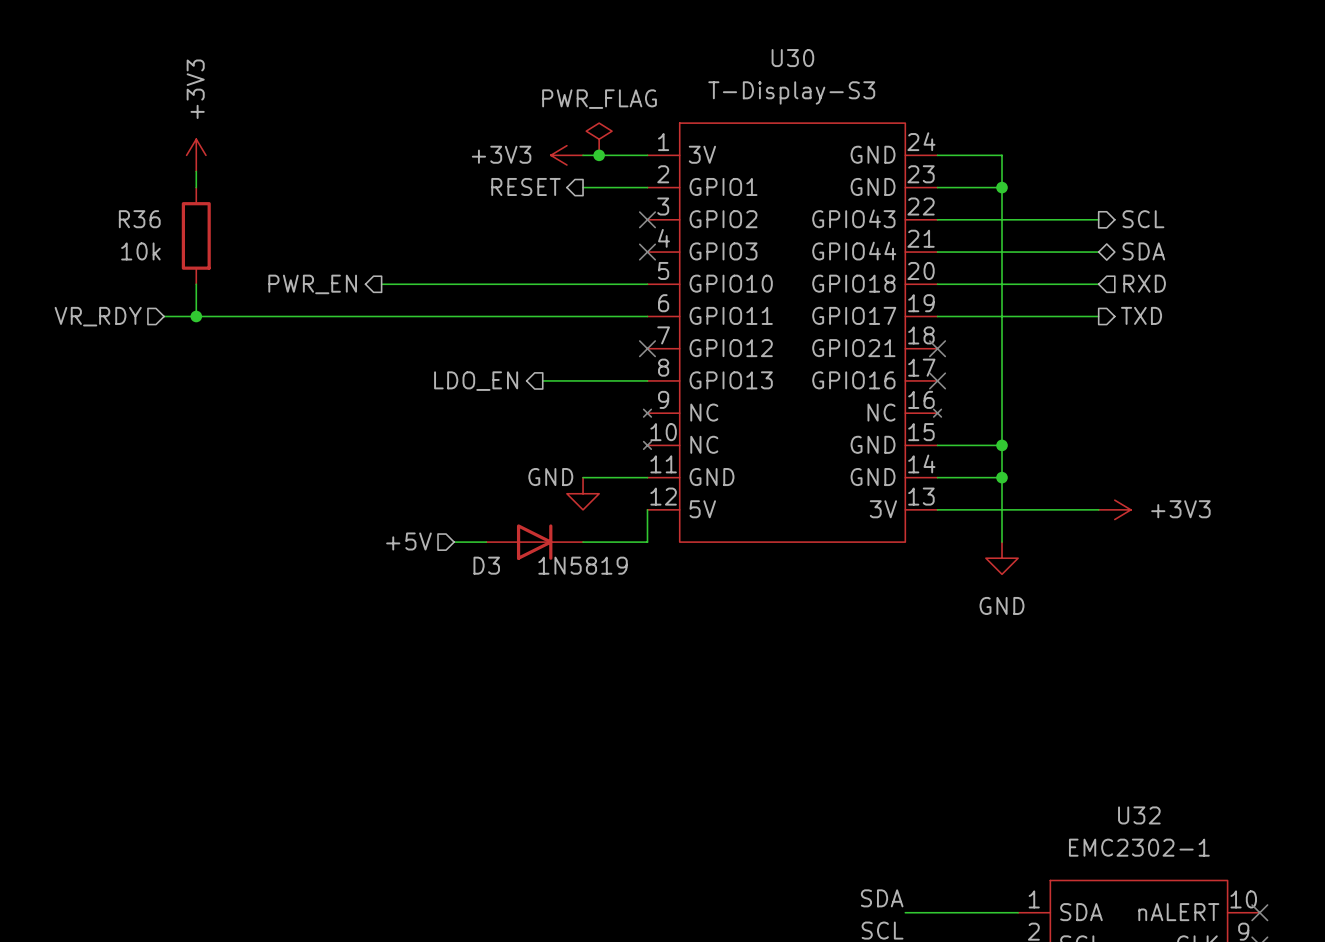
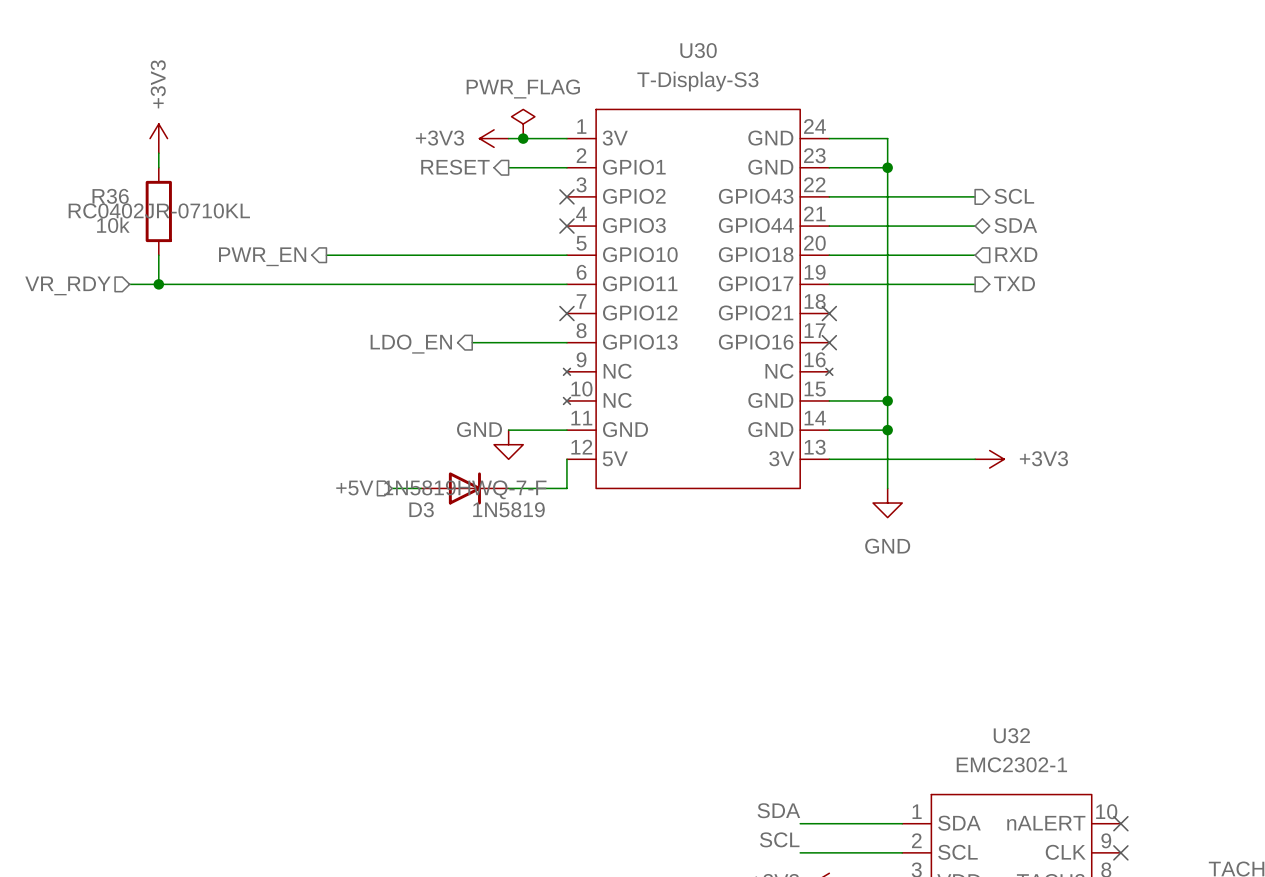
R36 text: none -> RC0402JR-0710KL (159, 210)
D3 text: none -> 1N5819HWQ-7-F (465, 489)

